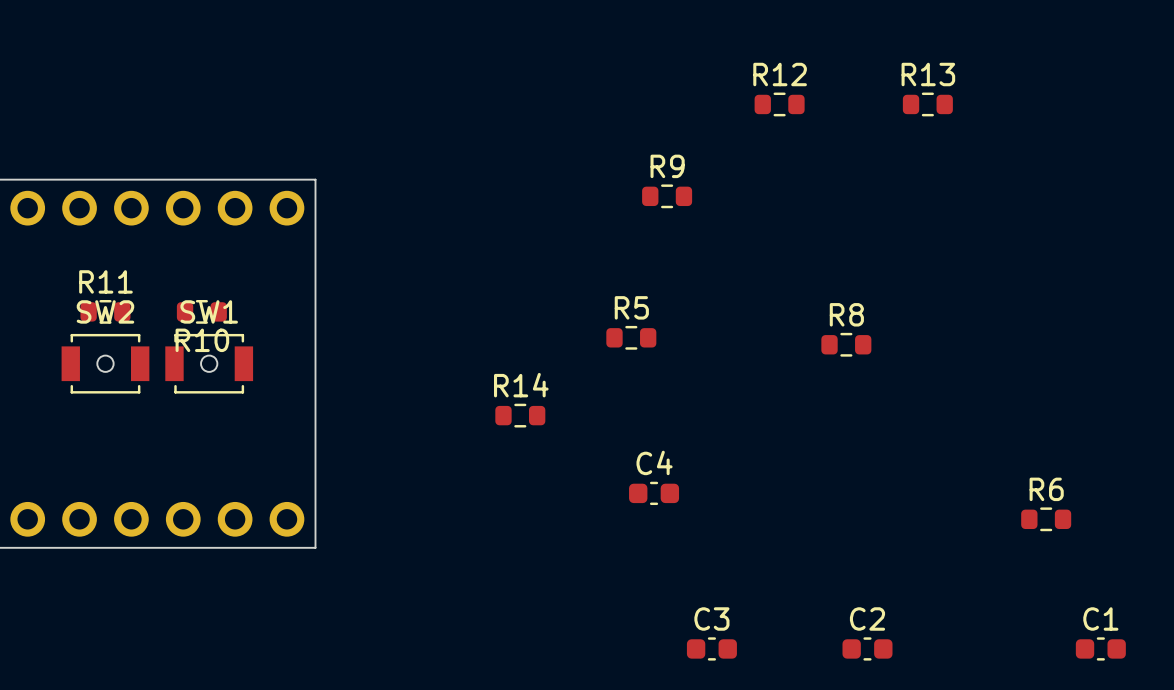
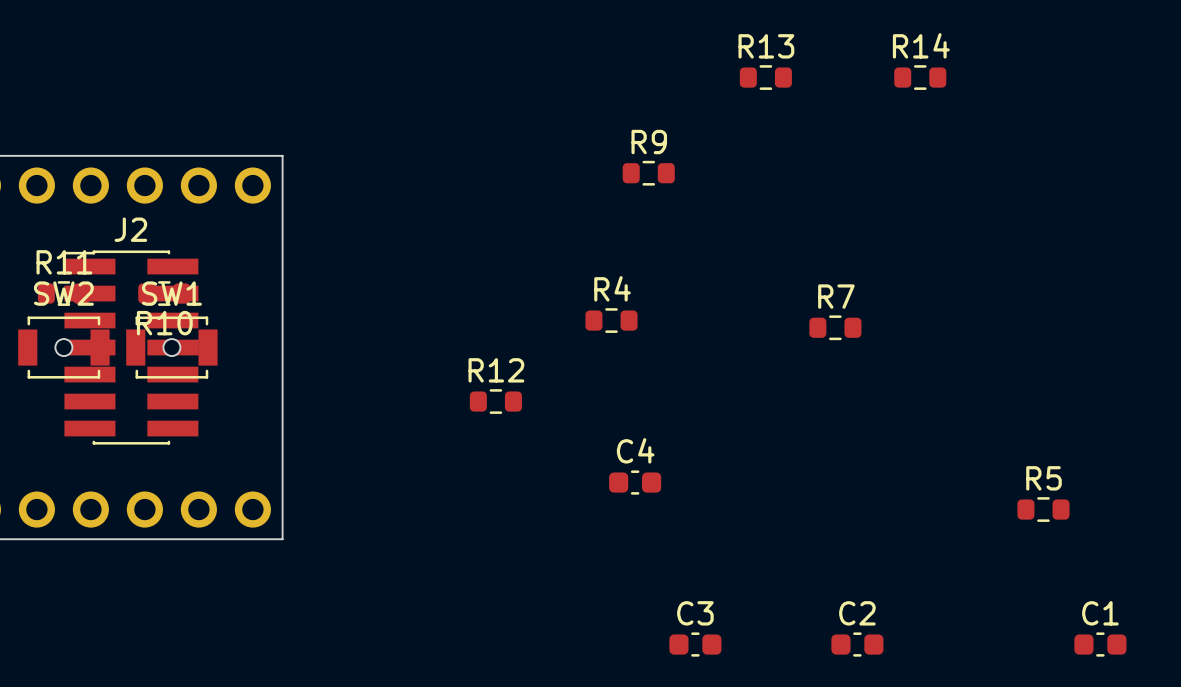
R12 name: R12 (780, 74) -> R13 (766, 46)
R13 name: R13 (928, 74) -> R14 (921, 45)
R5 name: R5 (631, 307) -> R4 (612, 288)
R8 name: R8 (846, 314) -> R7 (836, 296)
J2: none -> (131, 347)
R14 name: R14 (521, 385) -> R12 (496, 370)
R6 name: R6 (1046, 489) -> R5 (1043, 478)

